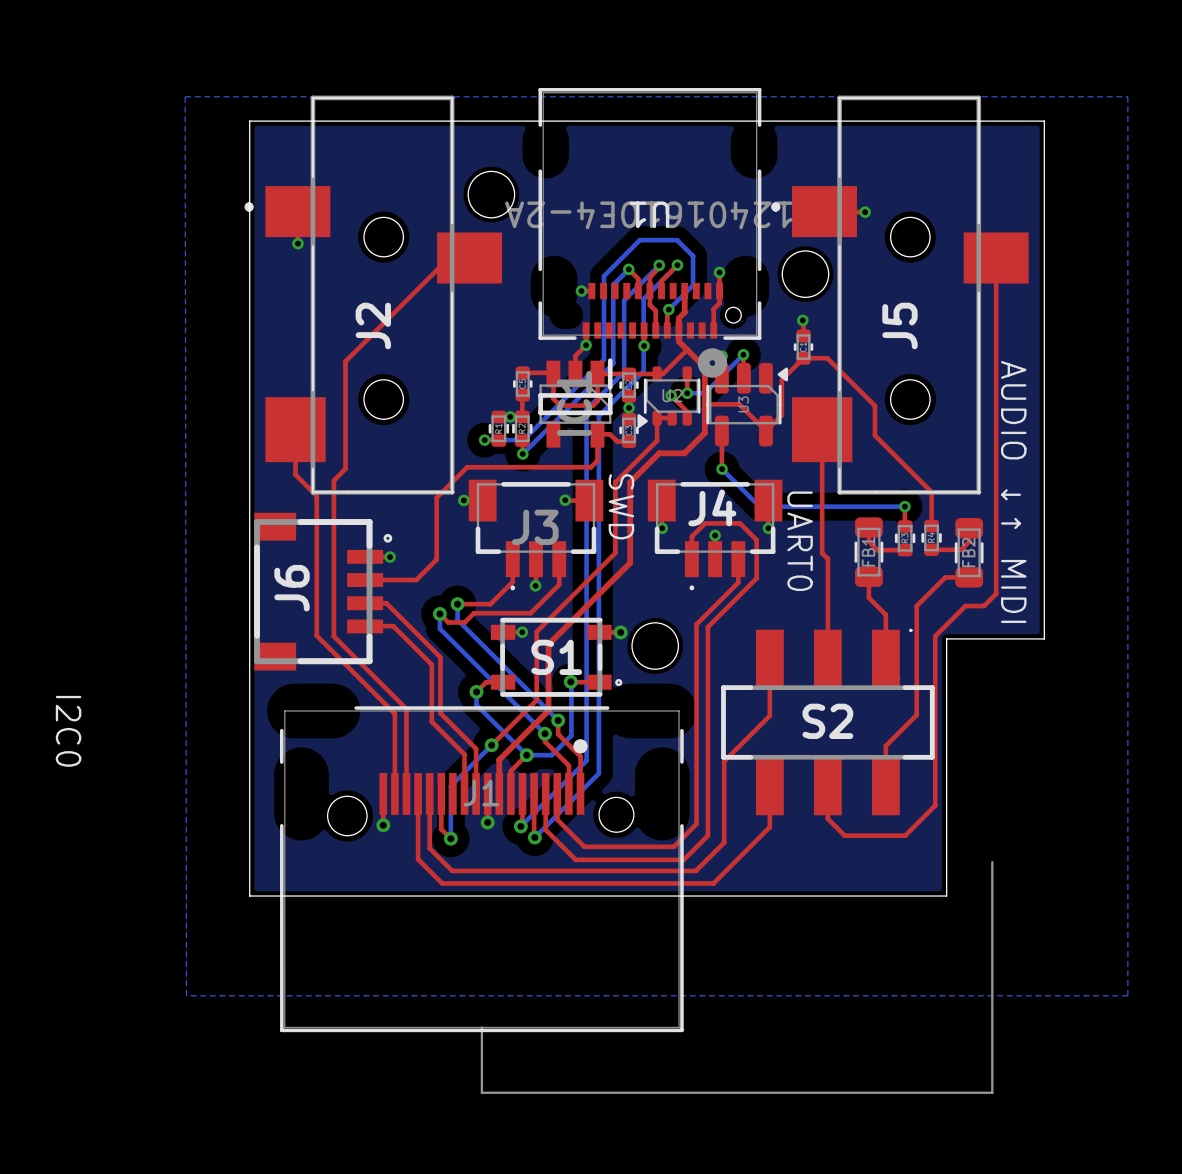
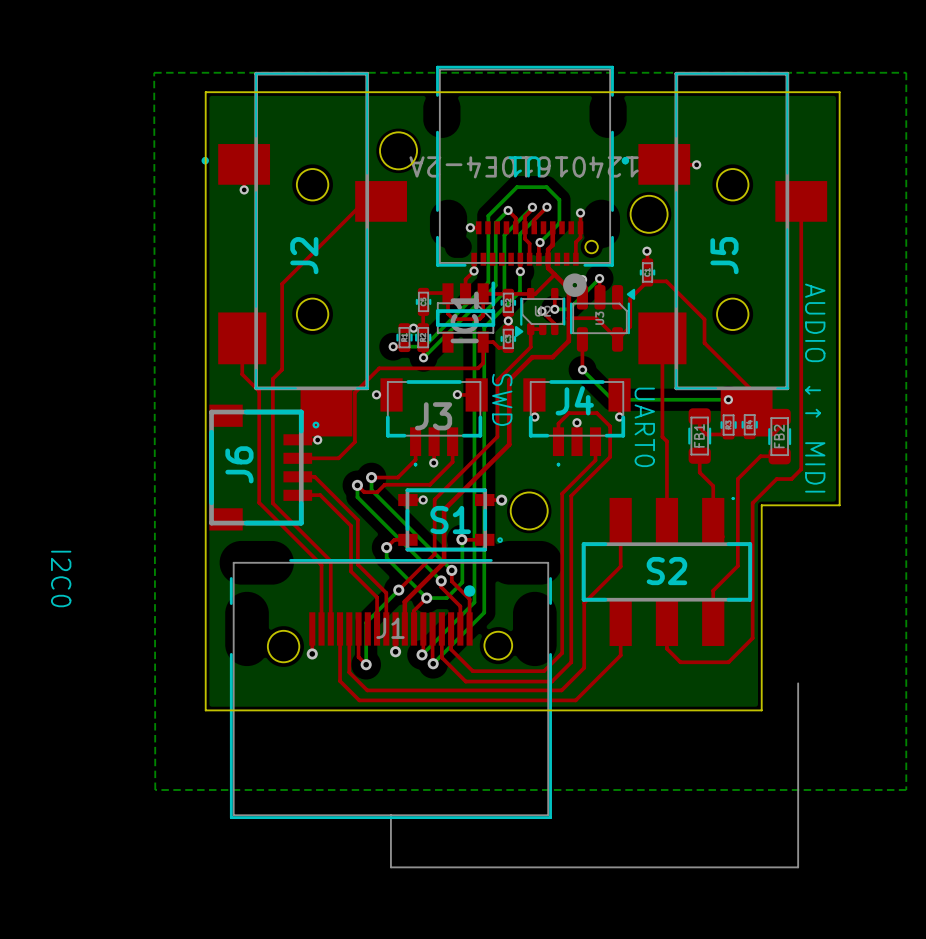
J2 footprint: [244, 95, 503, 495] -> [201, 71, 407, 437]
J5 footprint: [771, 95, 1029, 495] -> [621, 71, 828, 437]

